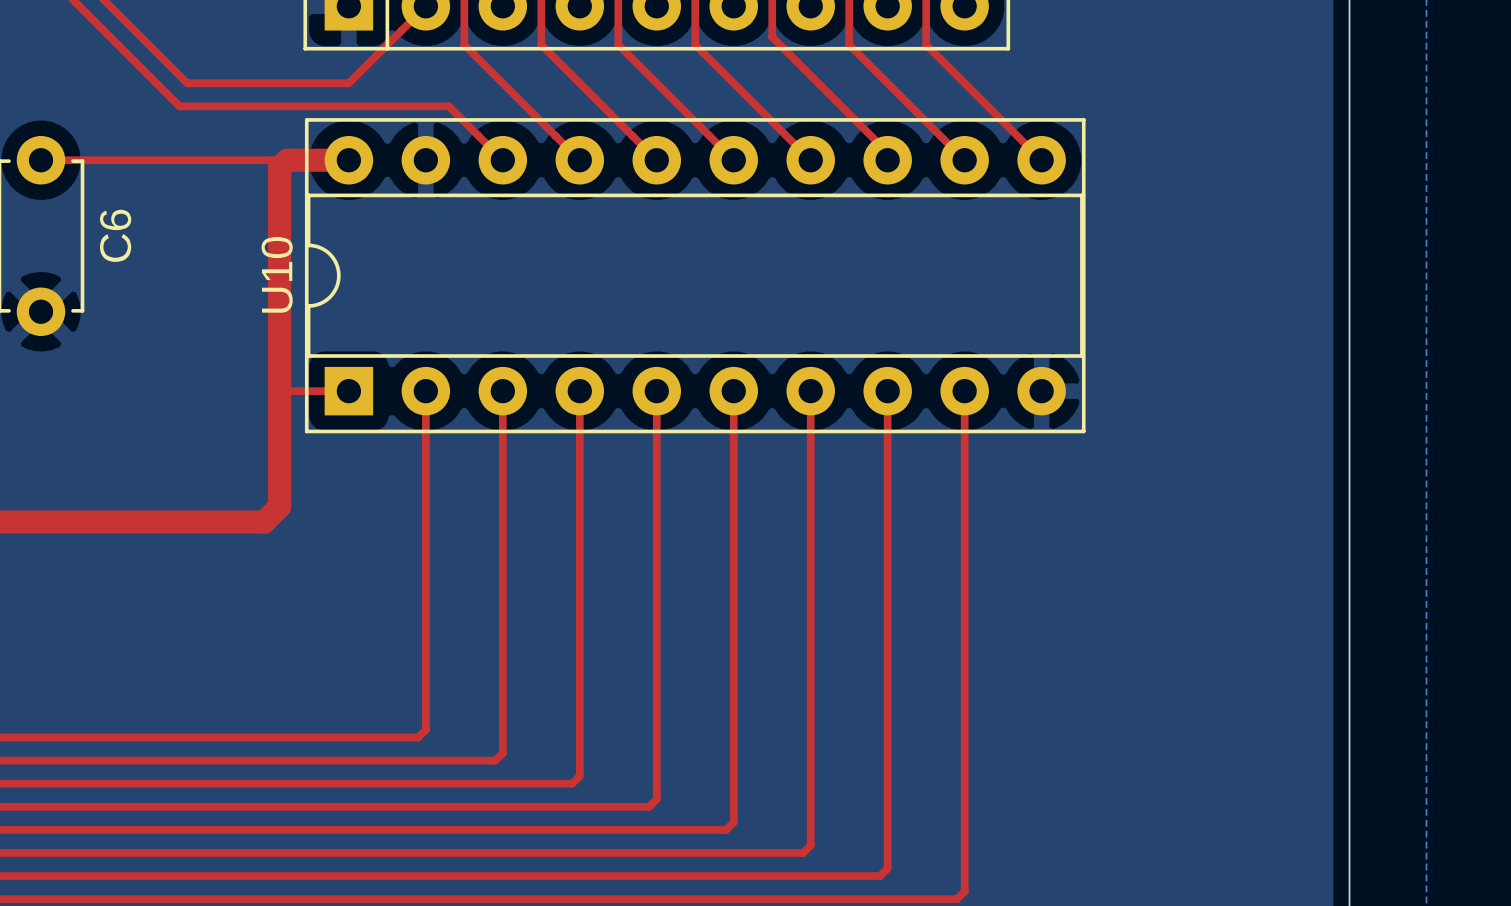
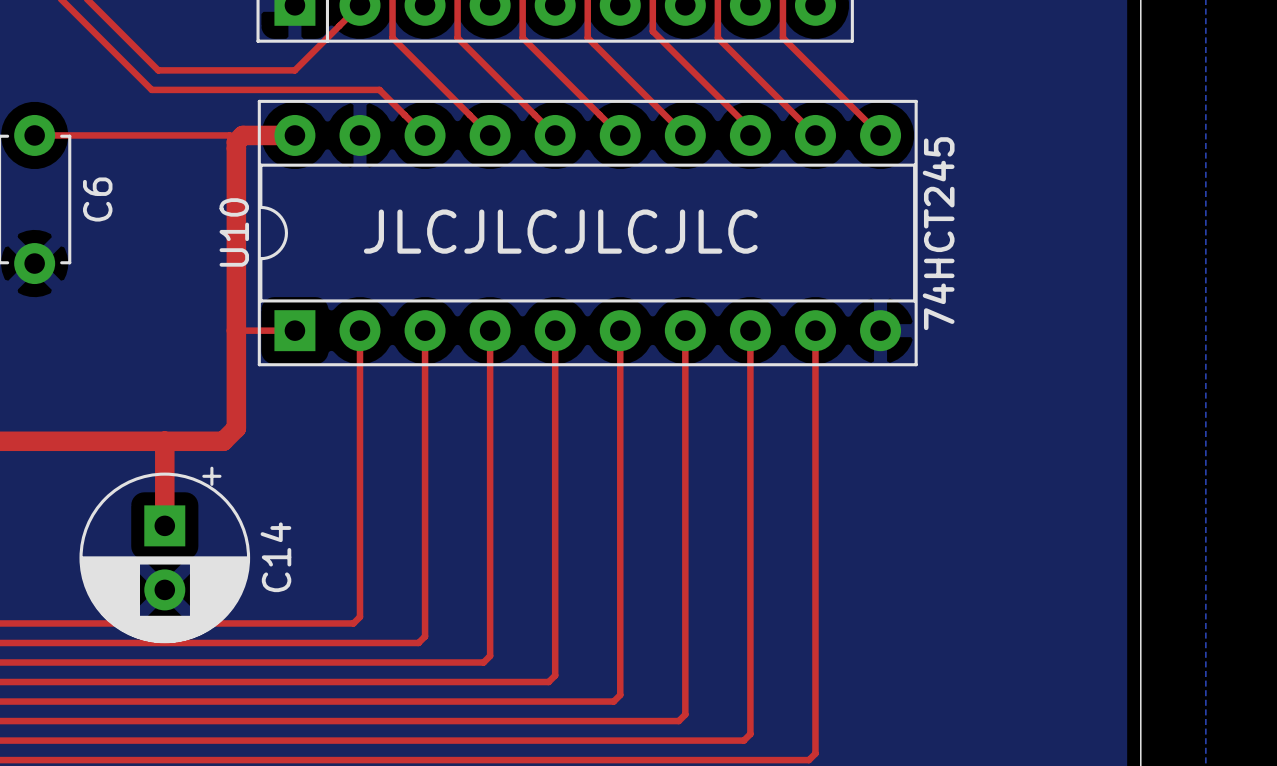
text: none -> JLCJLCJLCJLC (560, 231)
U10 value: none -> 74HCT245 (938, 233)
top track: none -> (164, 441) (164, 525)
C14: none -> (164, 554)

